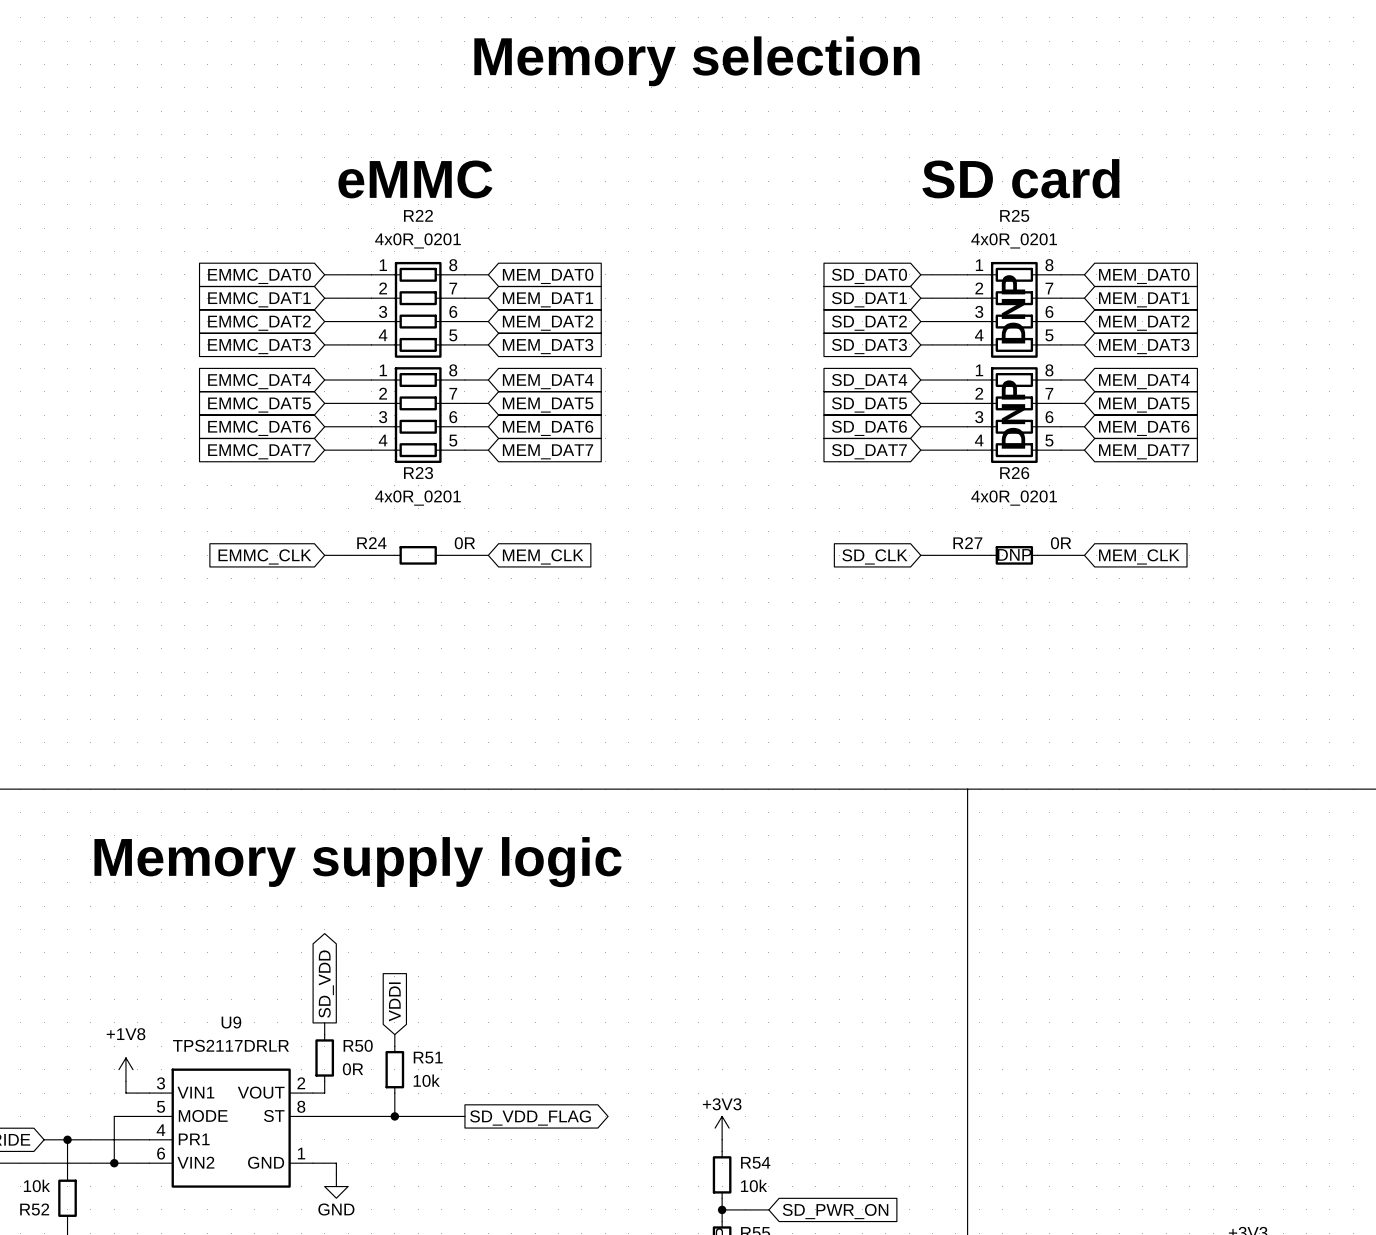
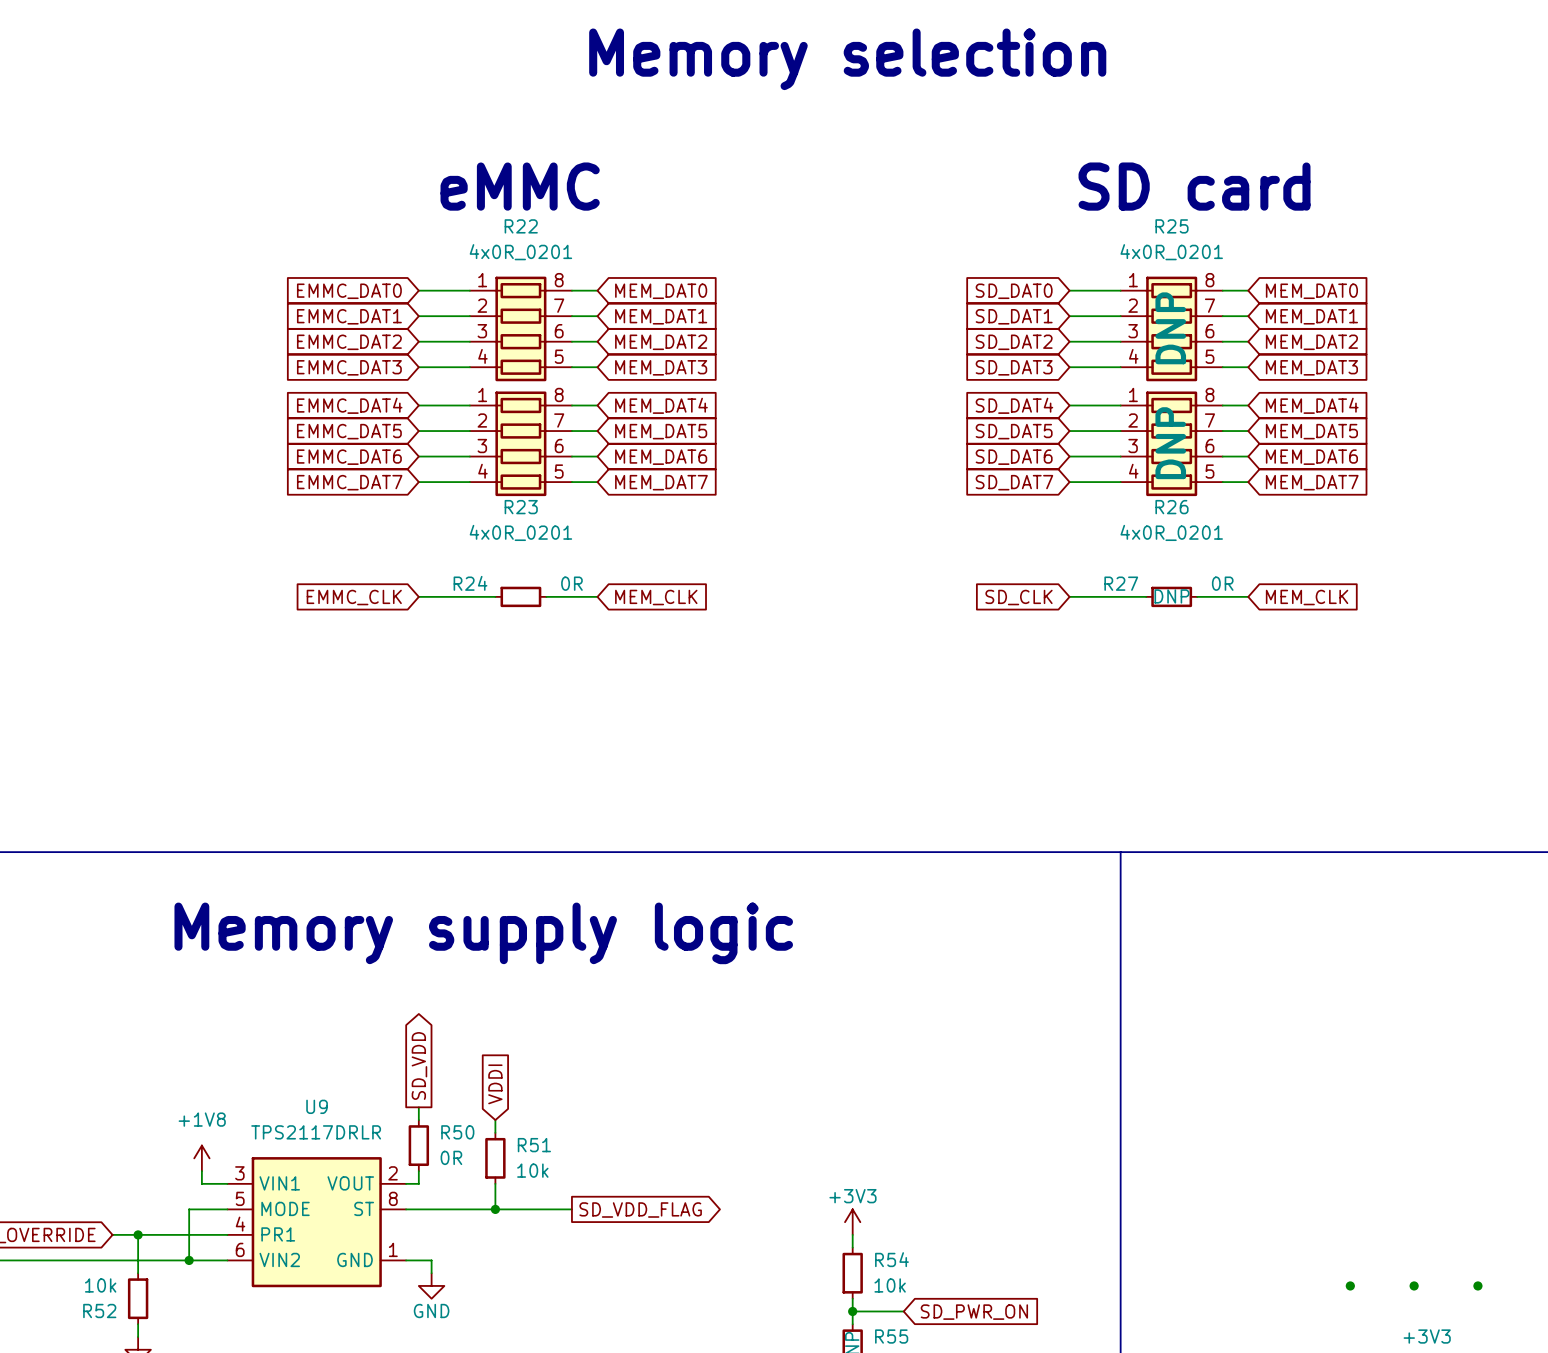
junction: none -> (1350, 1285)
junction: none -> (1414, 1285)
junction: none -> (1477, 1285)

